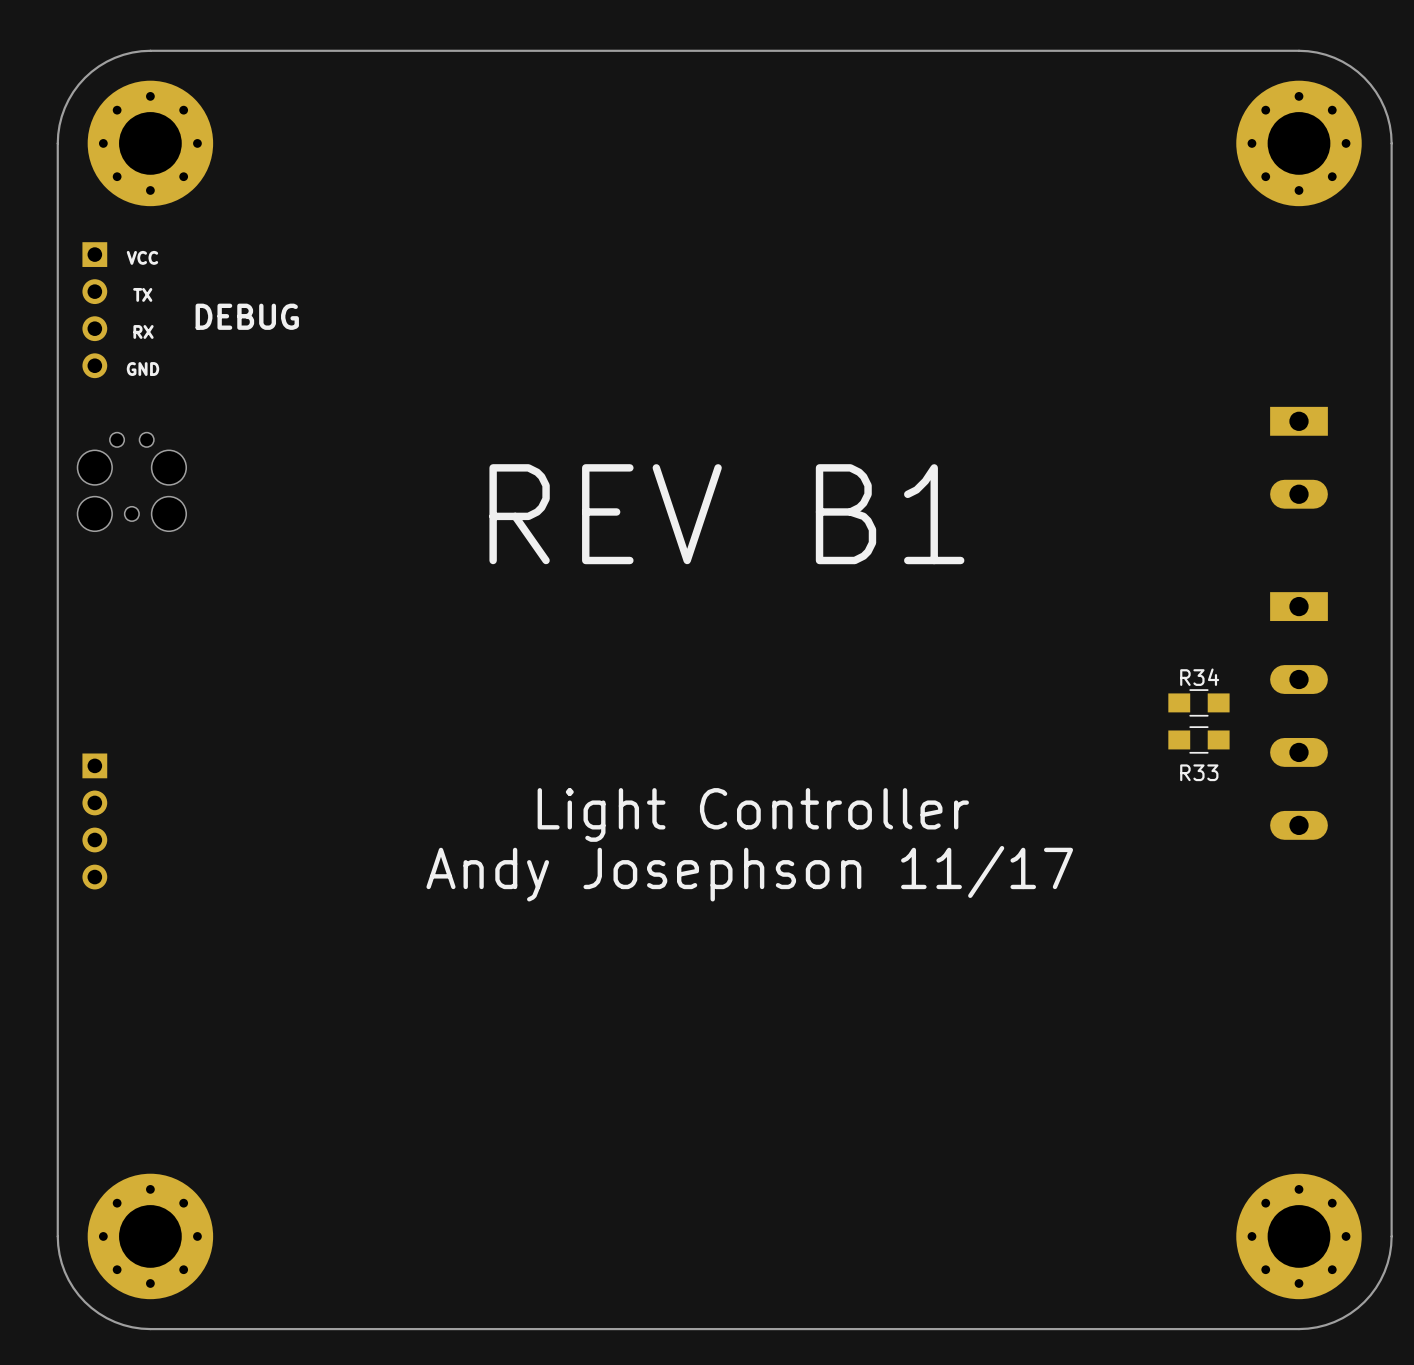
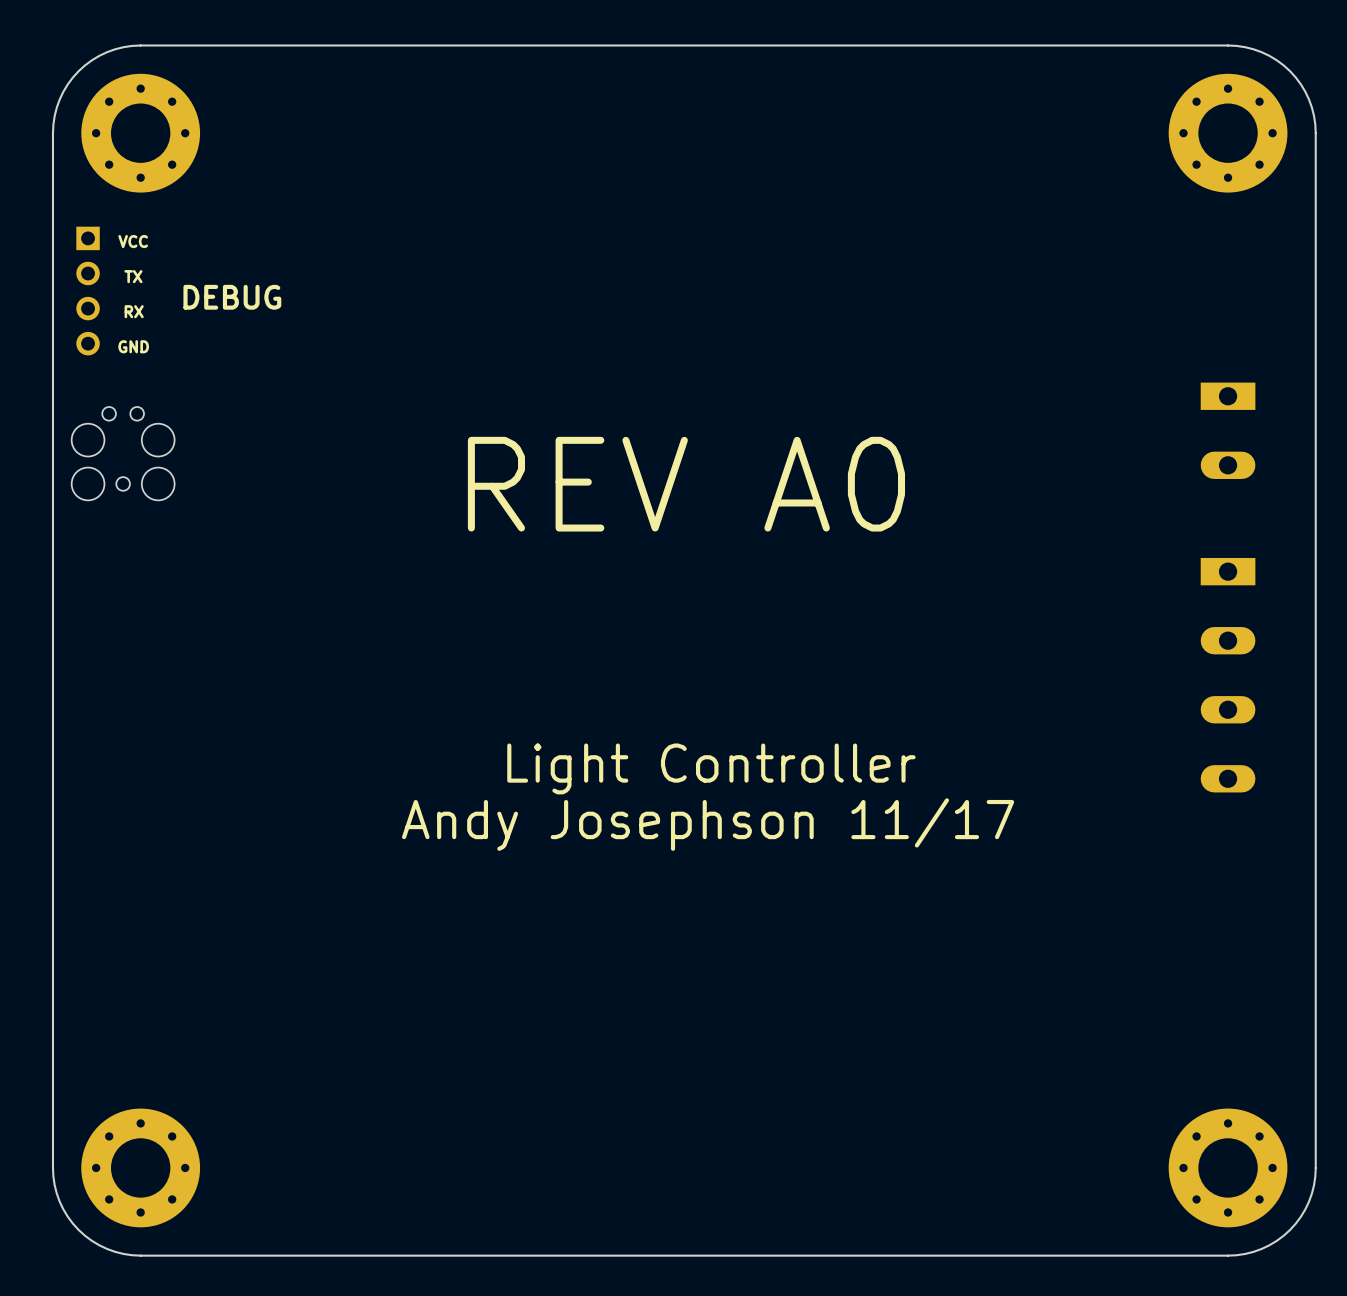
text: REV B1 (726, 514) -> REV A0 (686, 484)
R34: (1198, 702) -> none
R33: (1198, 739) -> none
part: (94, 821) -> none

